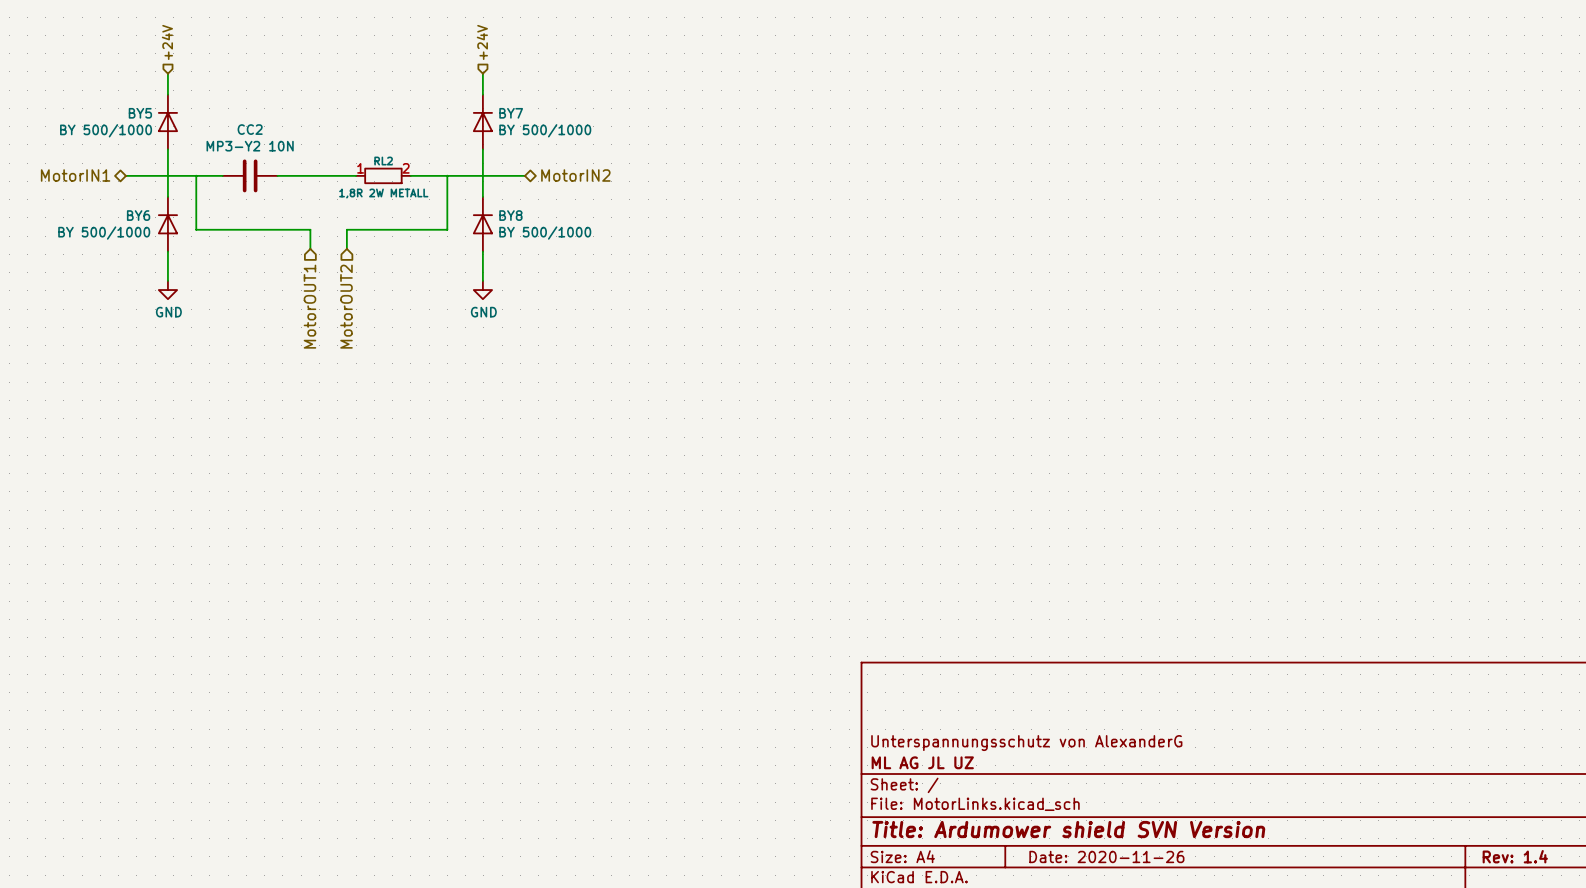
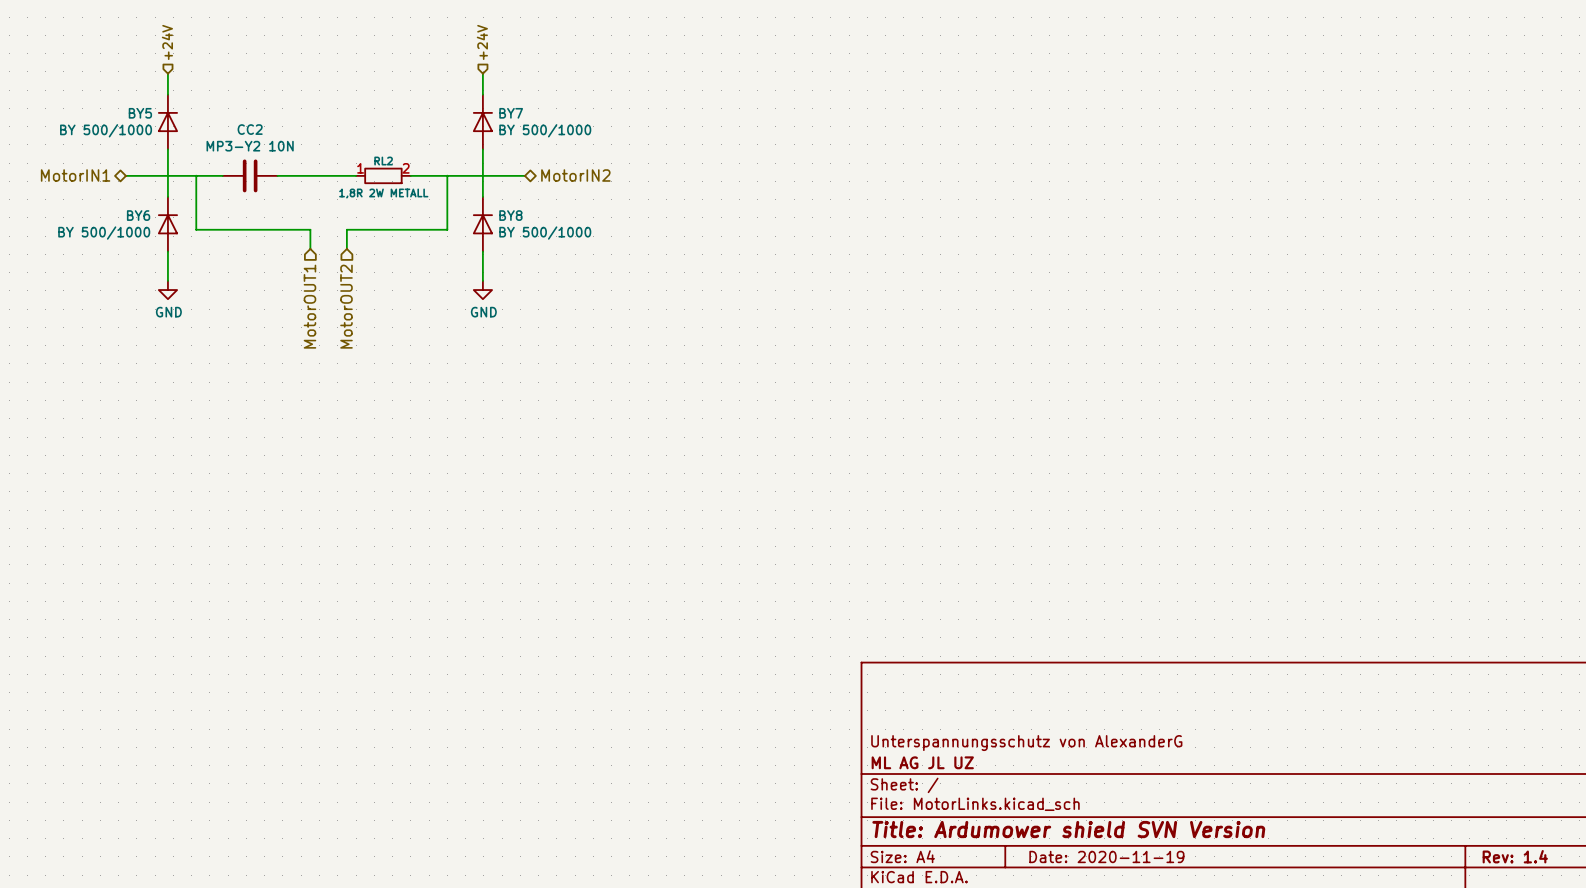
title block: Date: 2020-11-26 (1106, 856) -> Date: 2020-11-19 (1106, 856)

